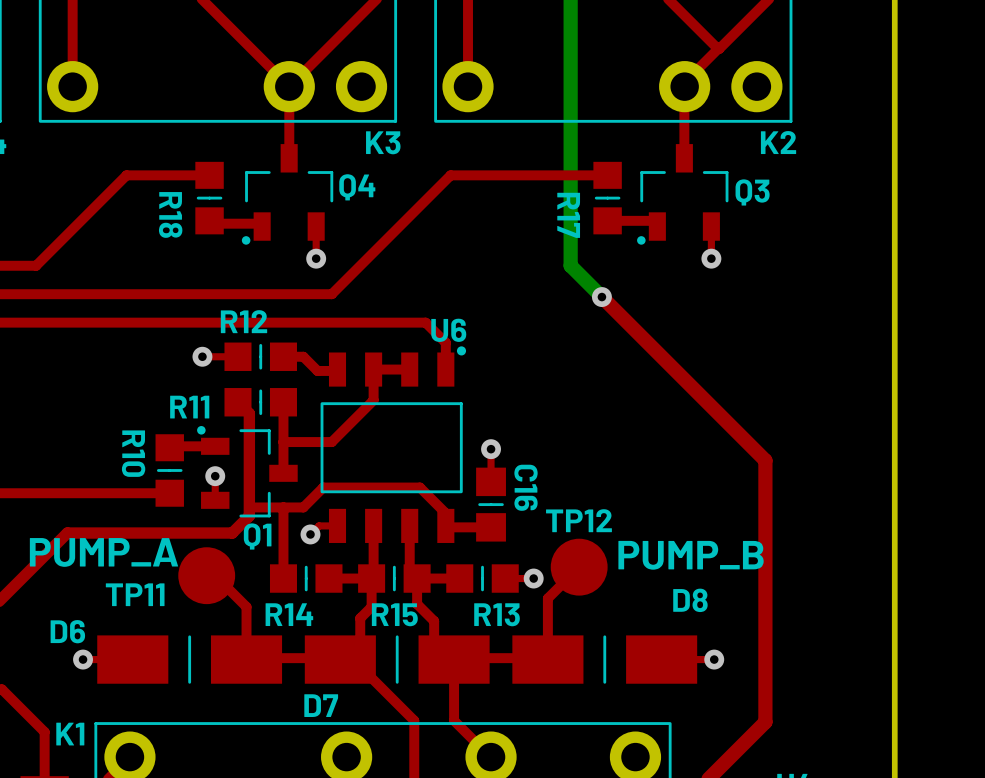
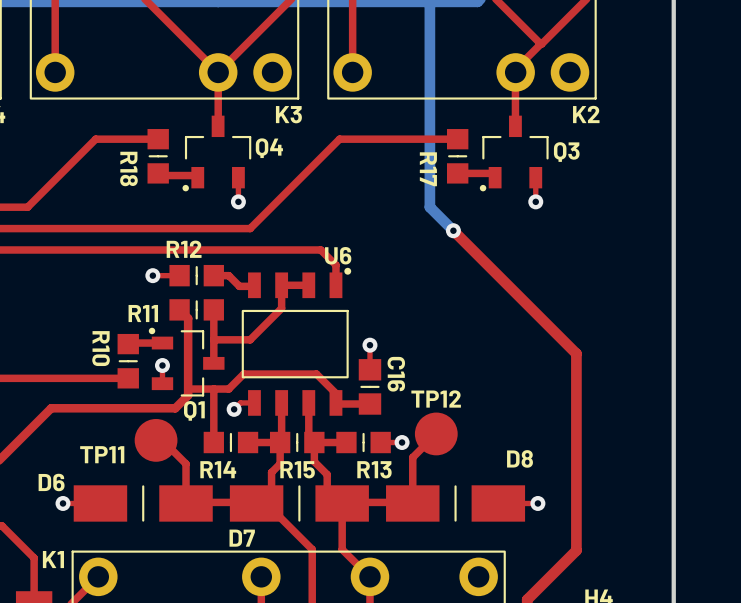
text: PUMP_A (103, 552) -> none
text: PUMP_B (691, 555) -> none

